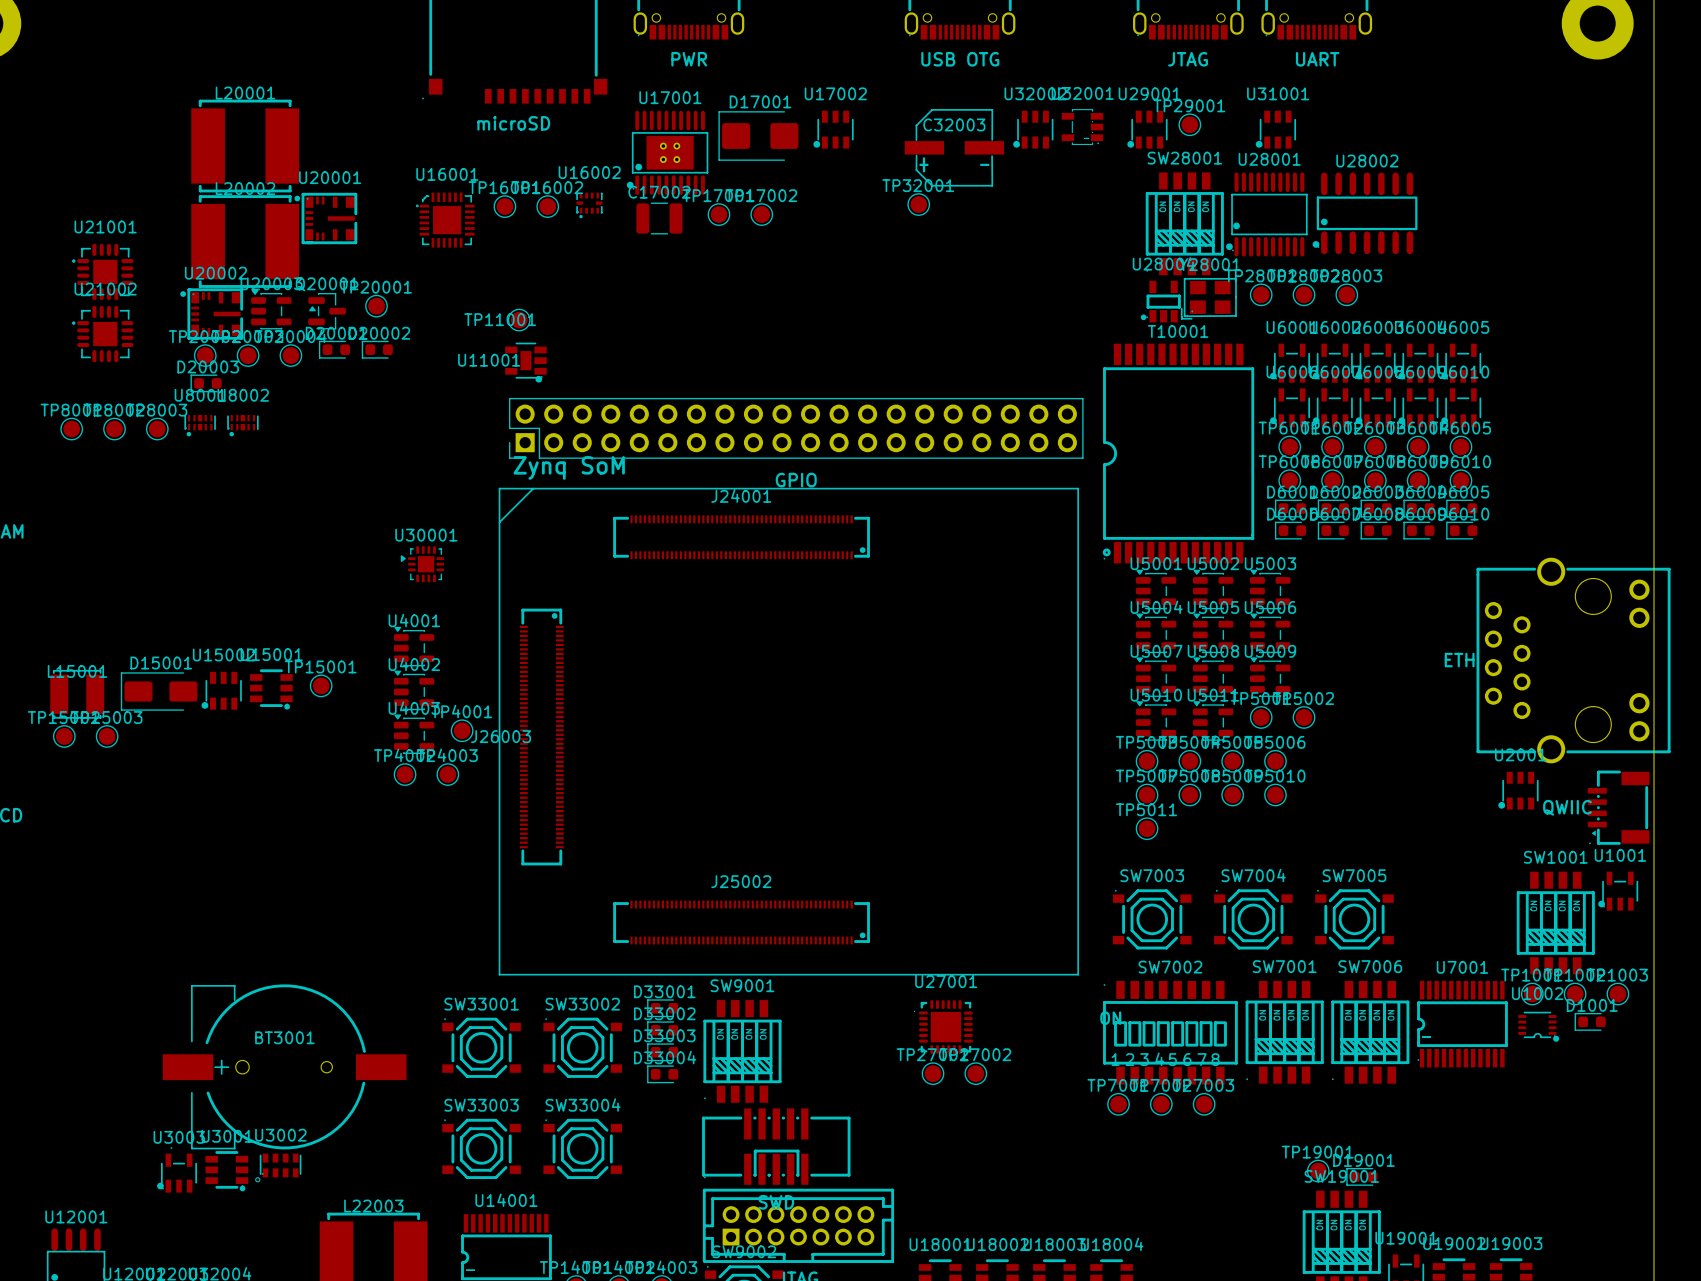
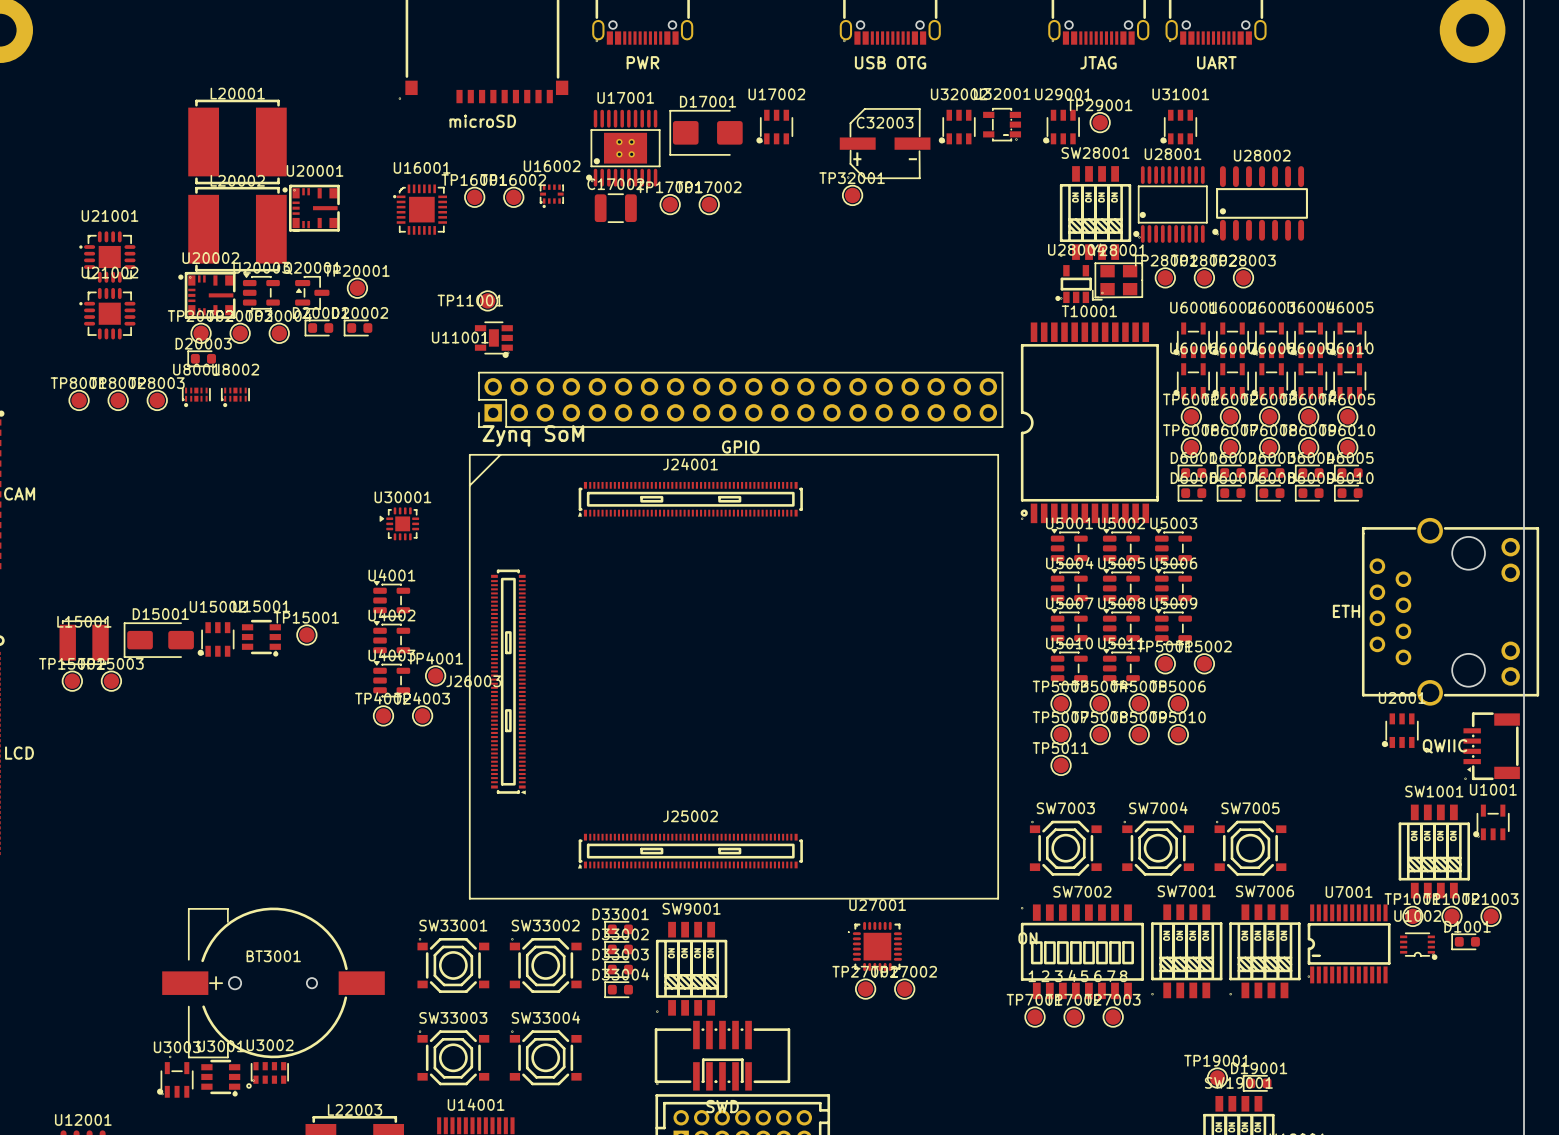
J24001 footprint: [613, 515, 870, 560] -> [577, 481, 803, 517]
J26003 footprint: [519, 608, 564, 866] -> [491, 569, 526, 795]
J25002 footprint: [613, 900, 870, 945] -> [577, 833, 803, 869]

